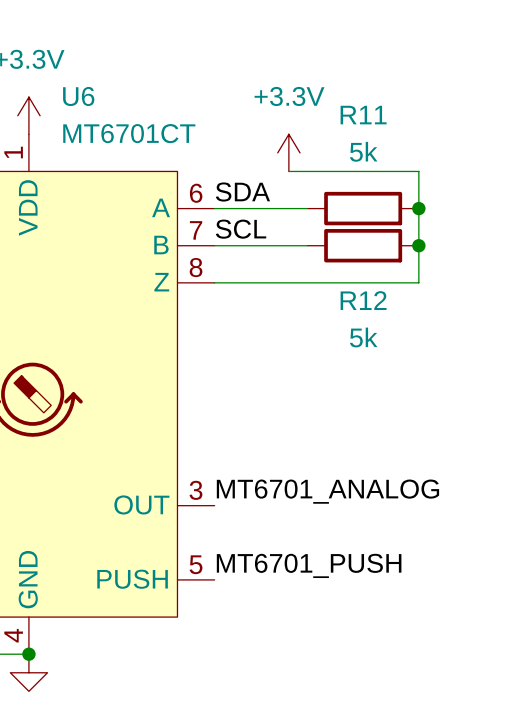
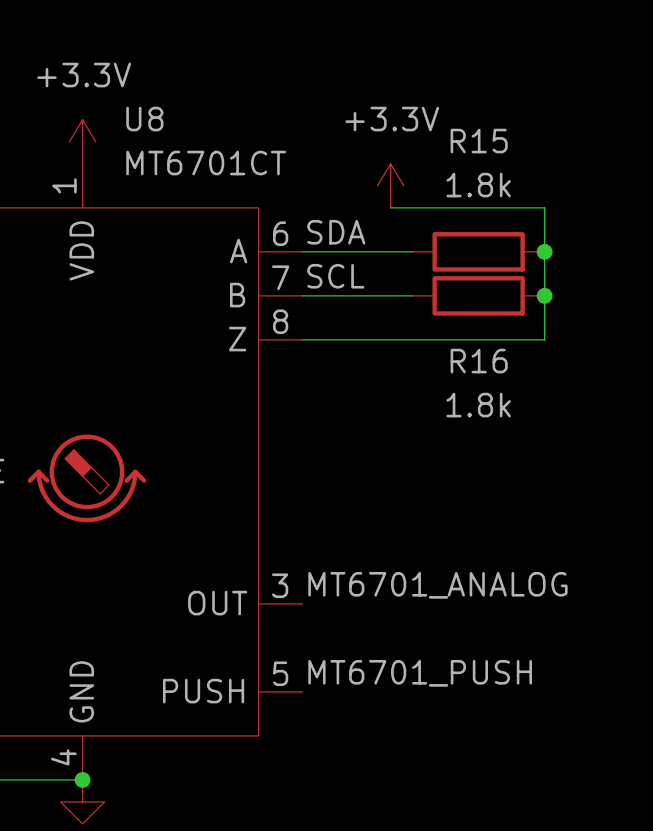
U6 name: U6 (78, 96) -> U8 (144, 119)
R11 name: R11 (363, 115) -> R15 (479, 141)
R11 value: 5k (363, 151) -> 1.8k (478, 185)
R12 name: R12 (363, 300) -> R16 (479, 361)
R12 value: 5k (363, 337) -> 1.8k (478, 405)

